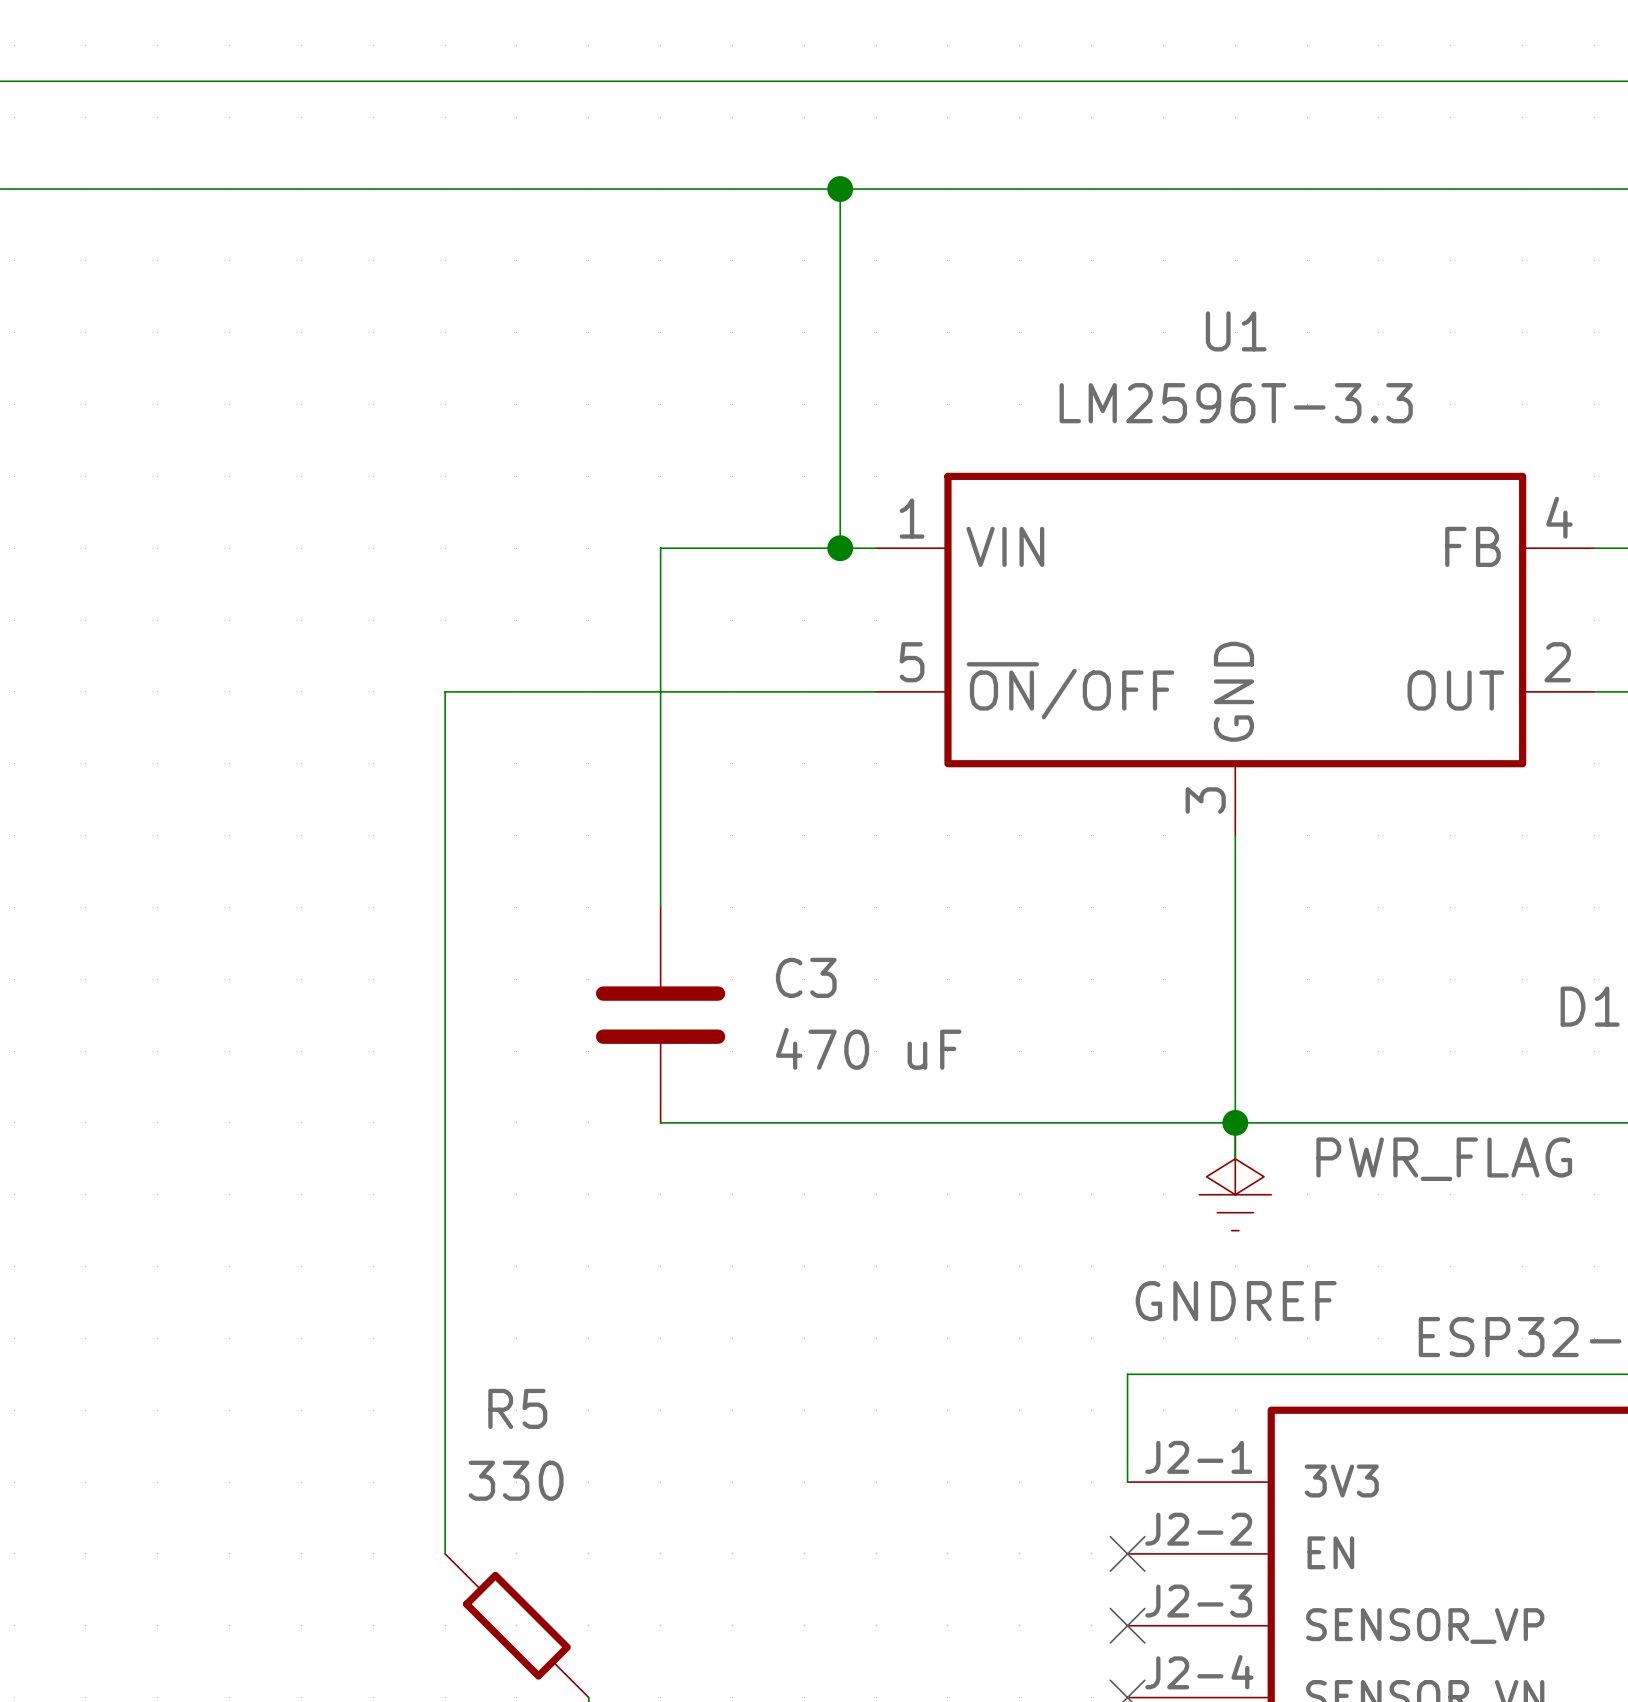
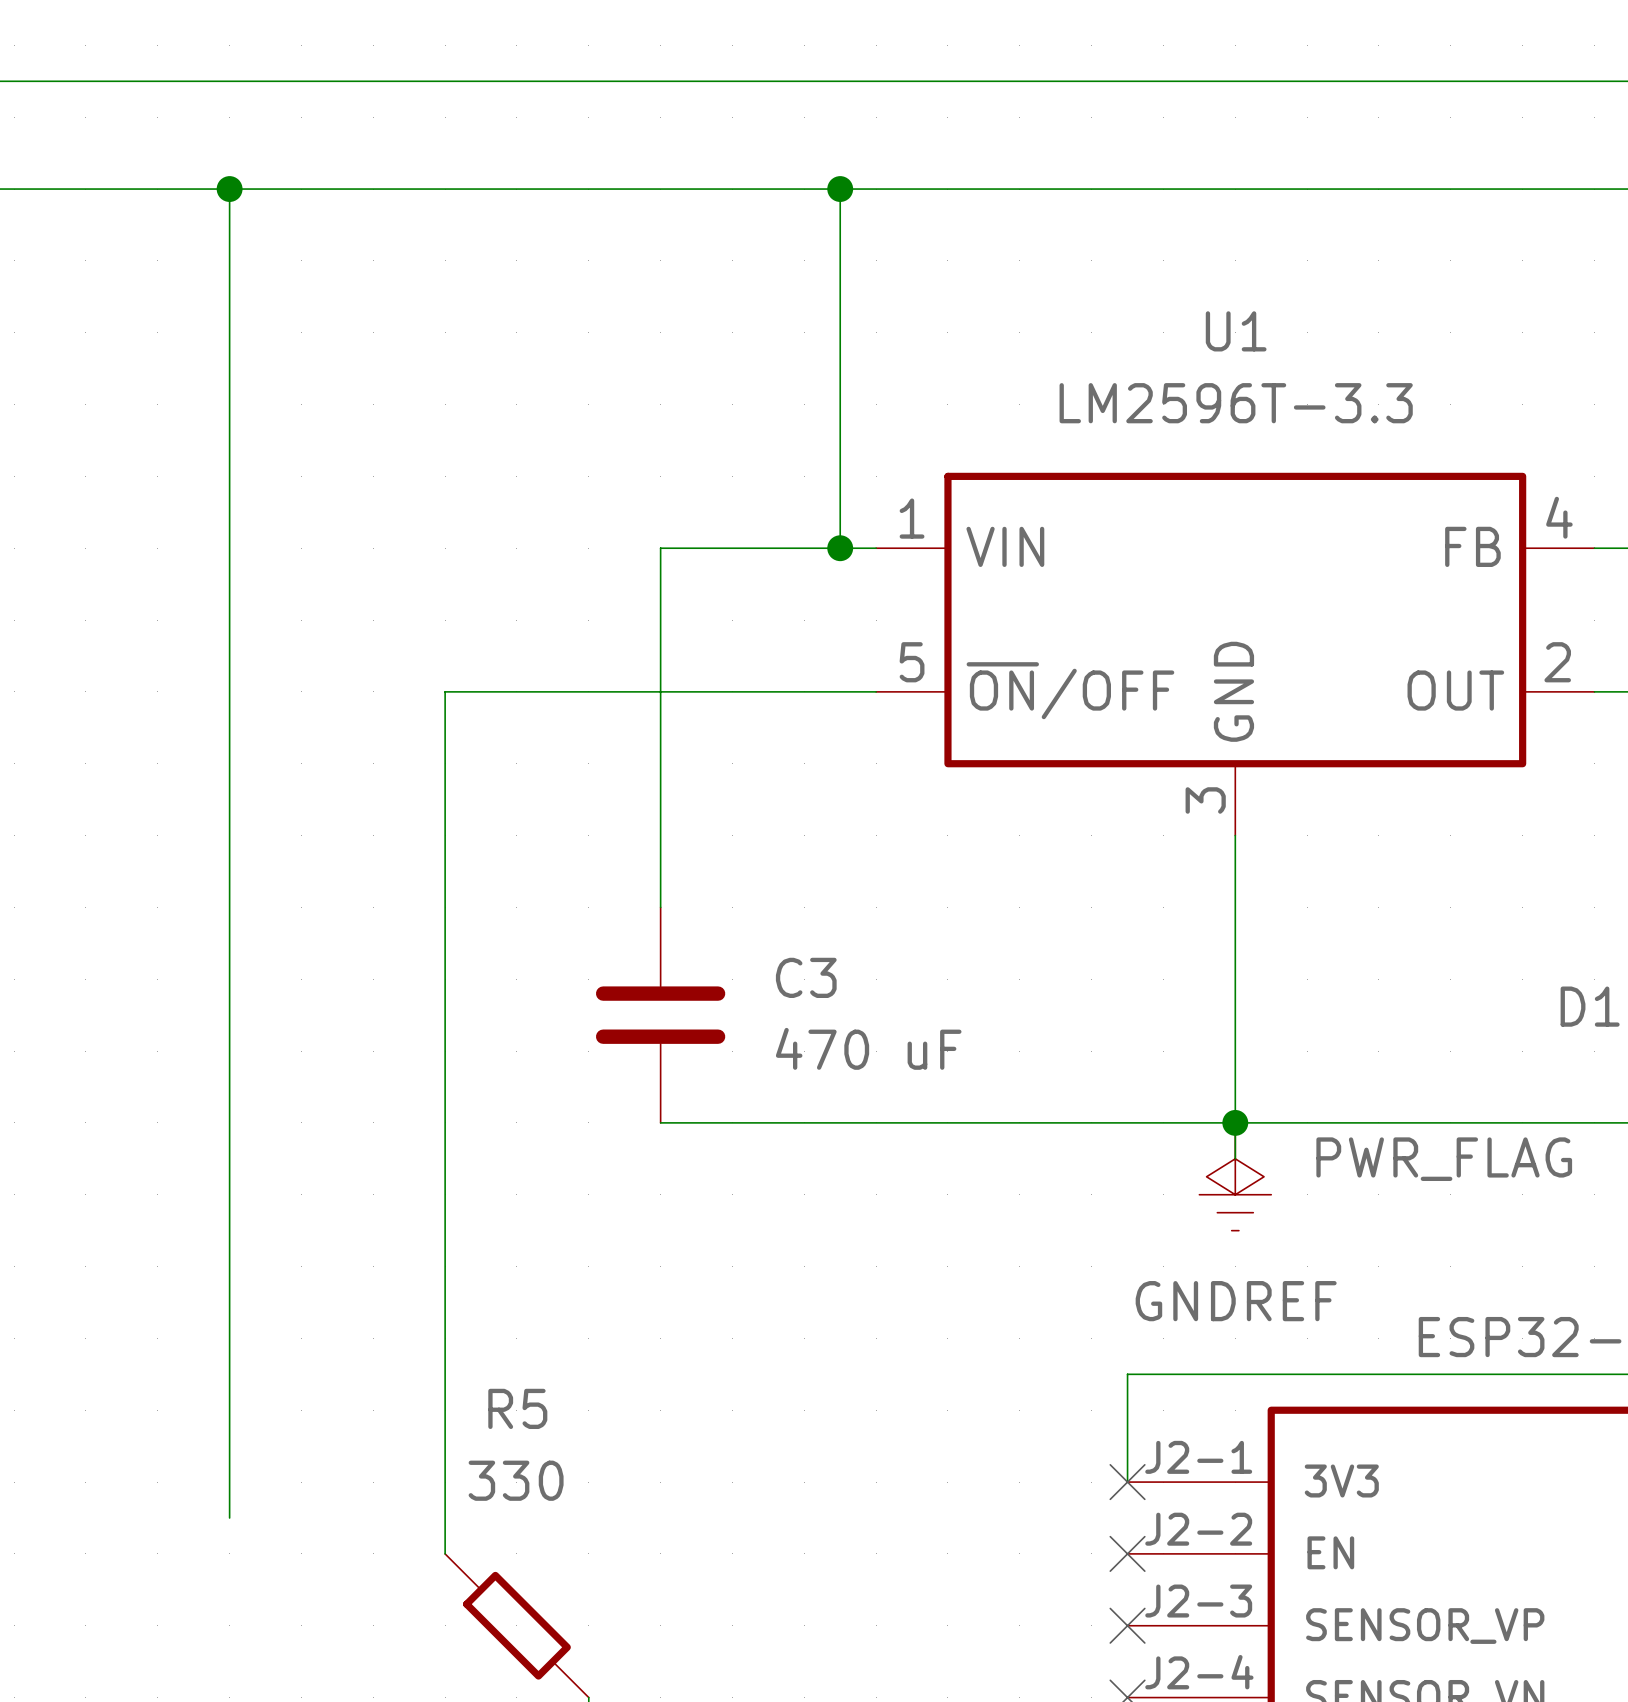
wire: none -> (229, 189) (229, 1517)
junction: none -> (229, 189)
no-connect mark: none -> (1127, 1482)

